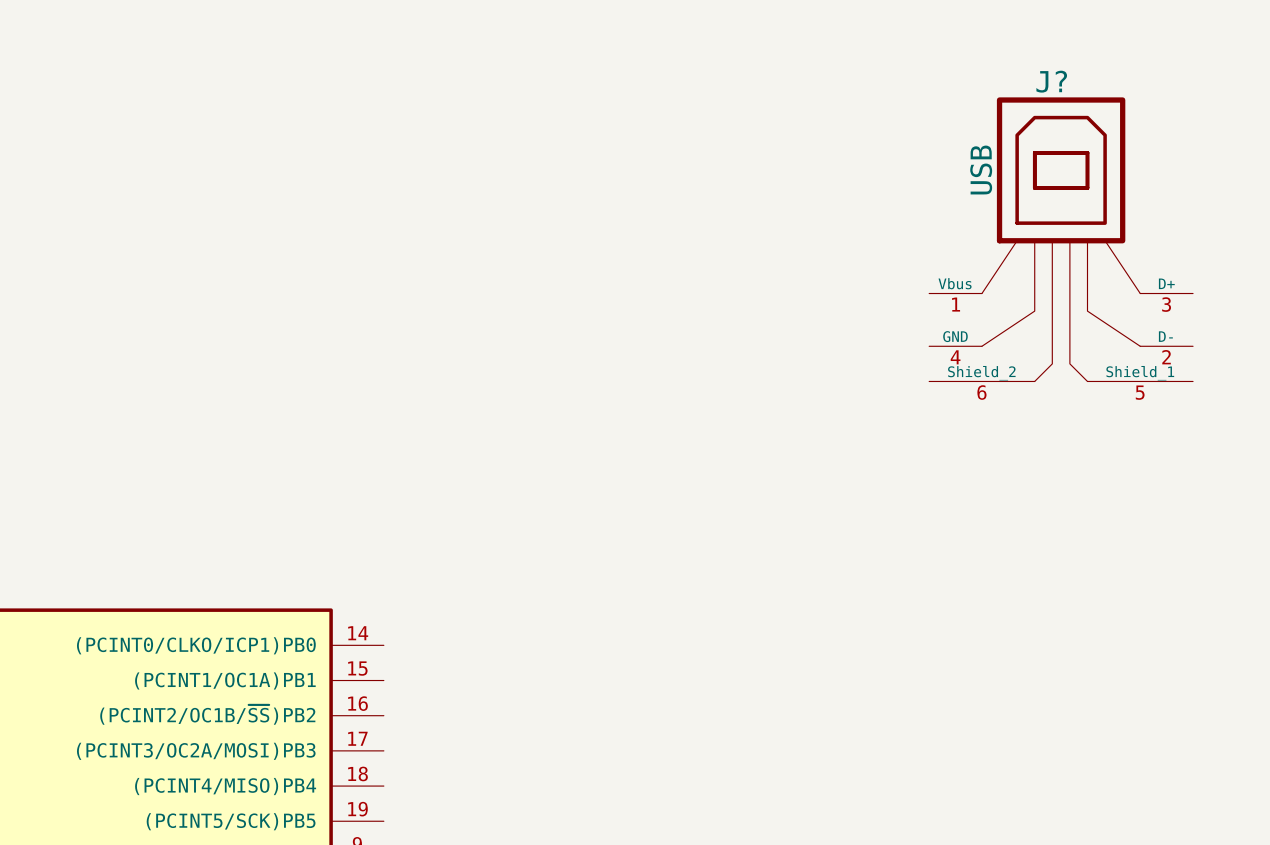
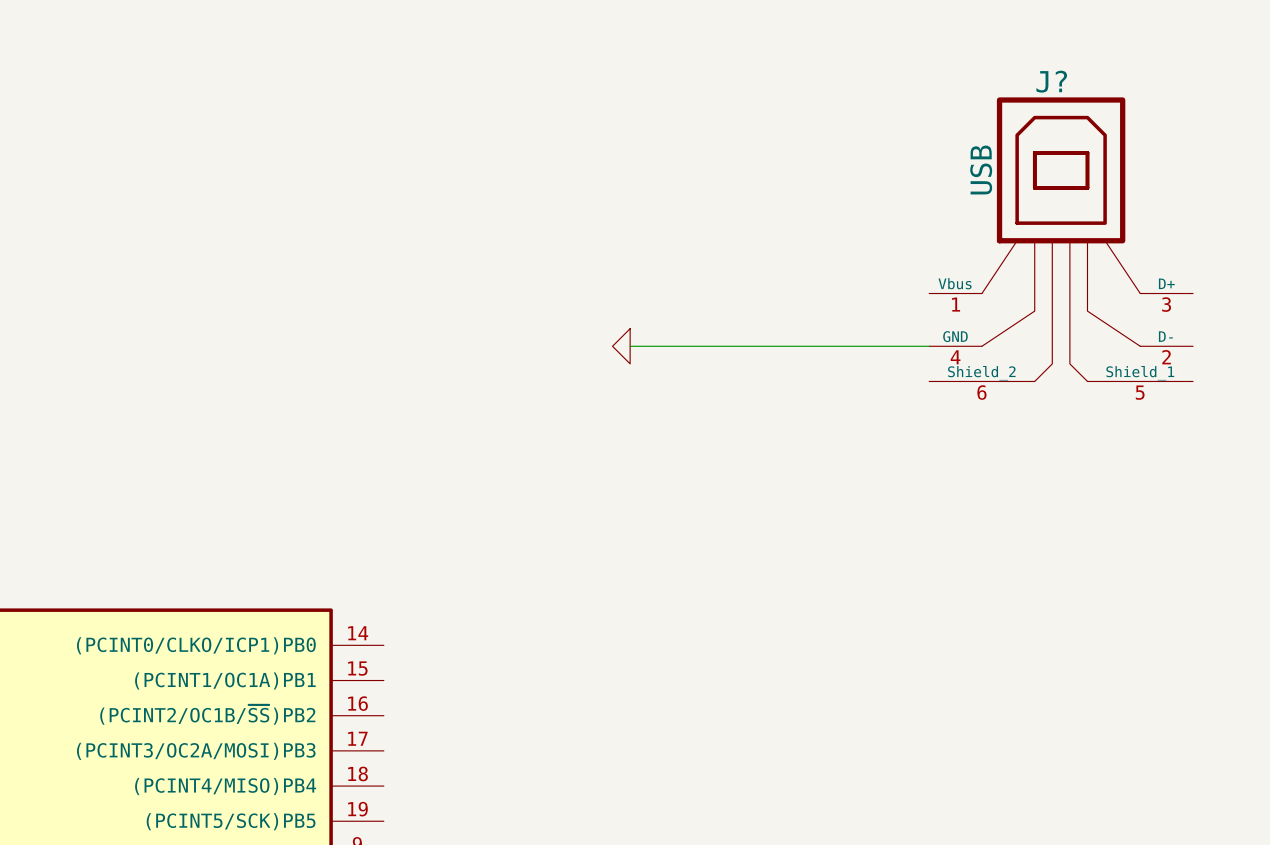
power symbol: none -> (621, 346)
wire: none -> (630, 346) (929, 346)

